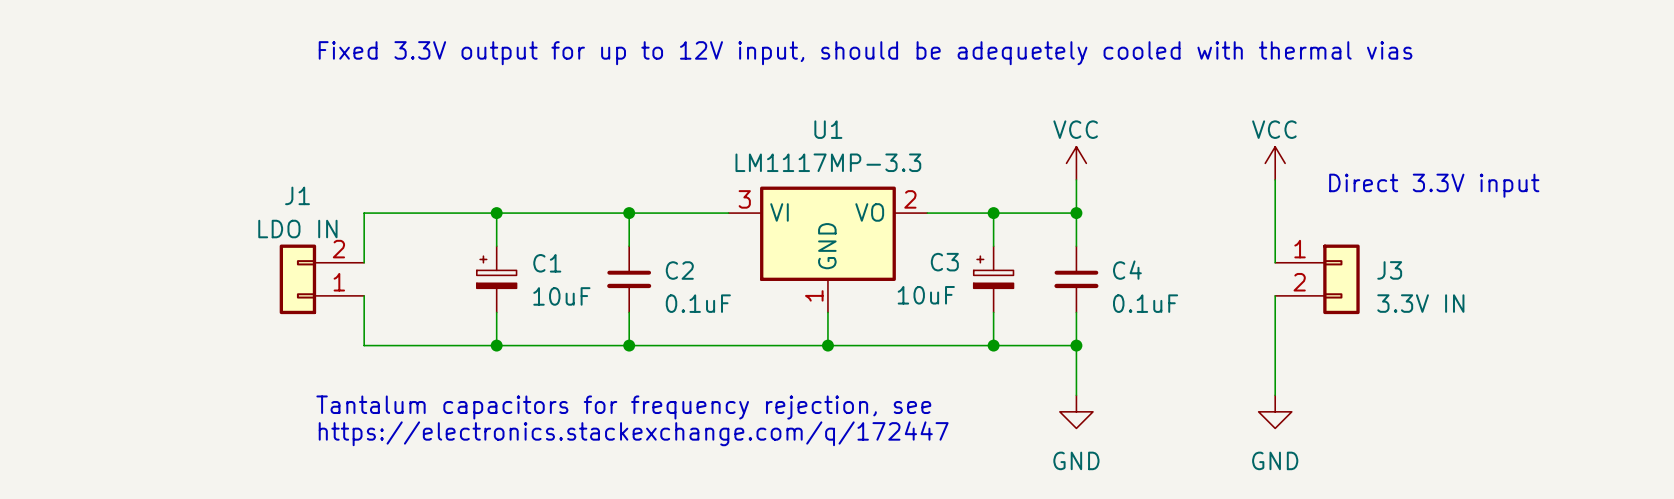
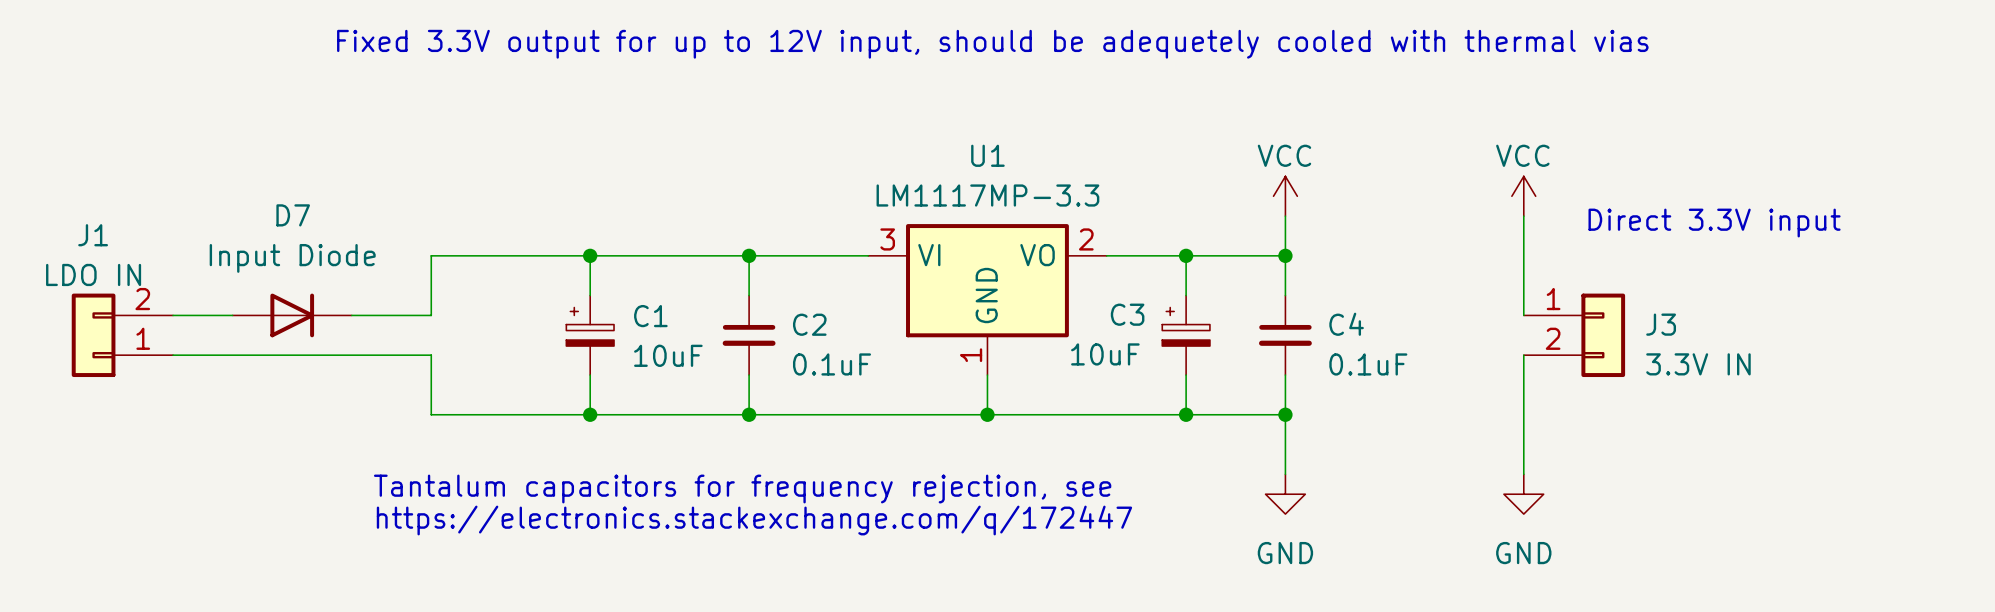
text position: Fixed 3.3V output for up to 12V input, should be adequetely cooled with thermal vias (865, 53) -> Fixed 3.3V output for up to 12V input, should be adequetely cooled with thermal vias (992, 44)
wire: none -> (173, 315) (232, 315)
D7: none -> Input Diode (292, 315)
J1 position: (321, 279) -> (122, 335)
wire: none -> (173, 355) (431, 355)

